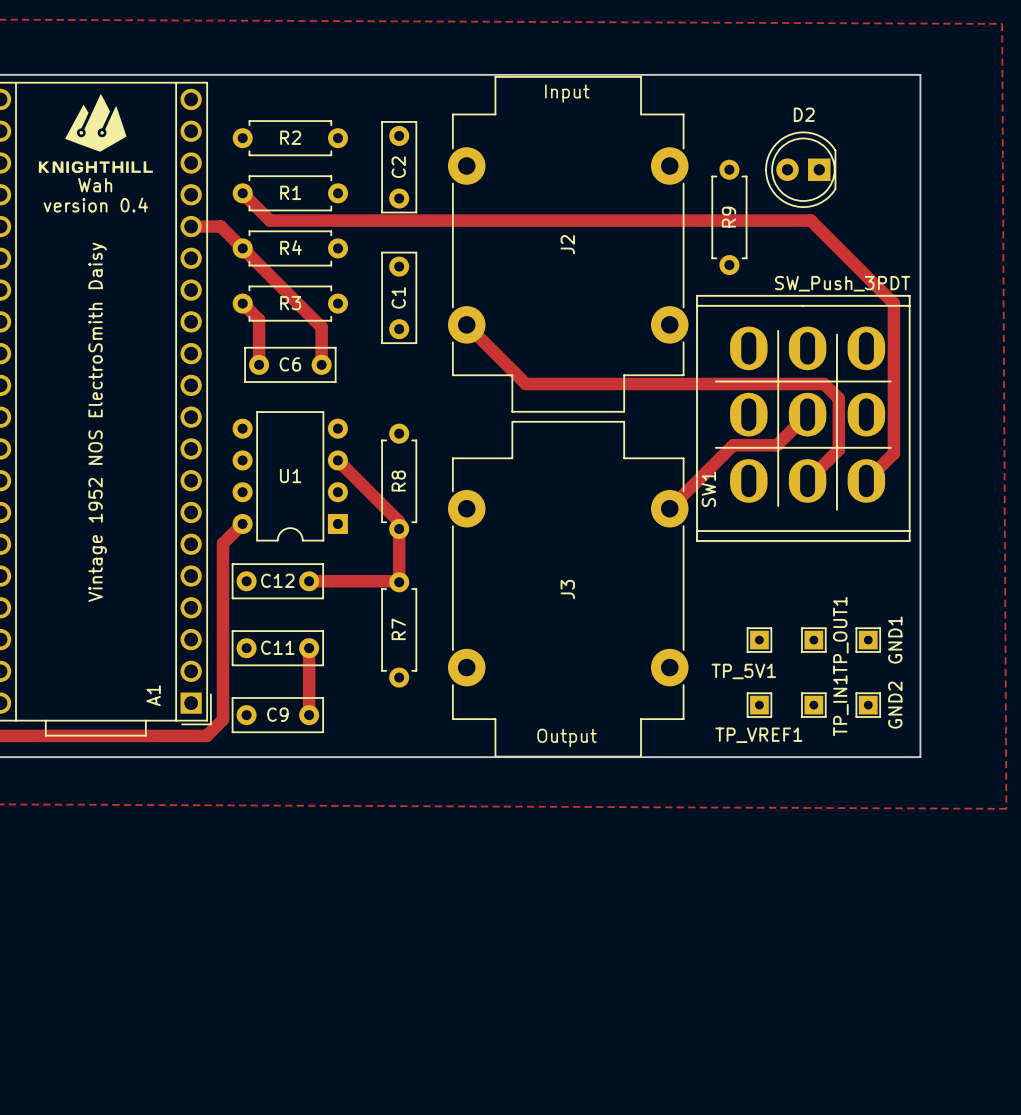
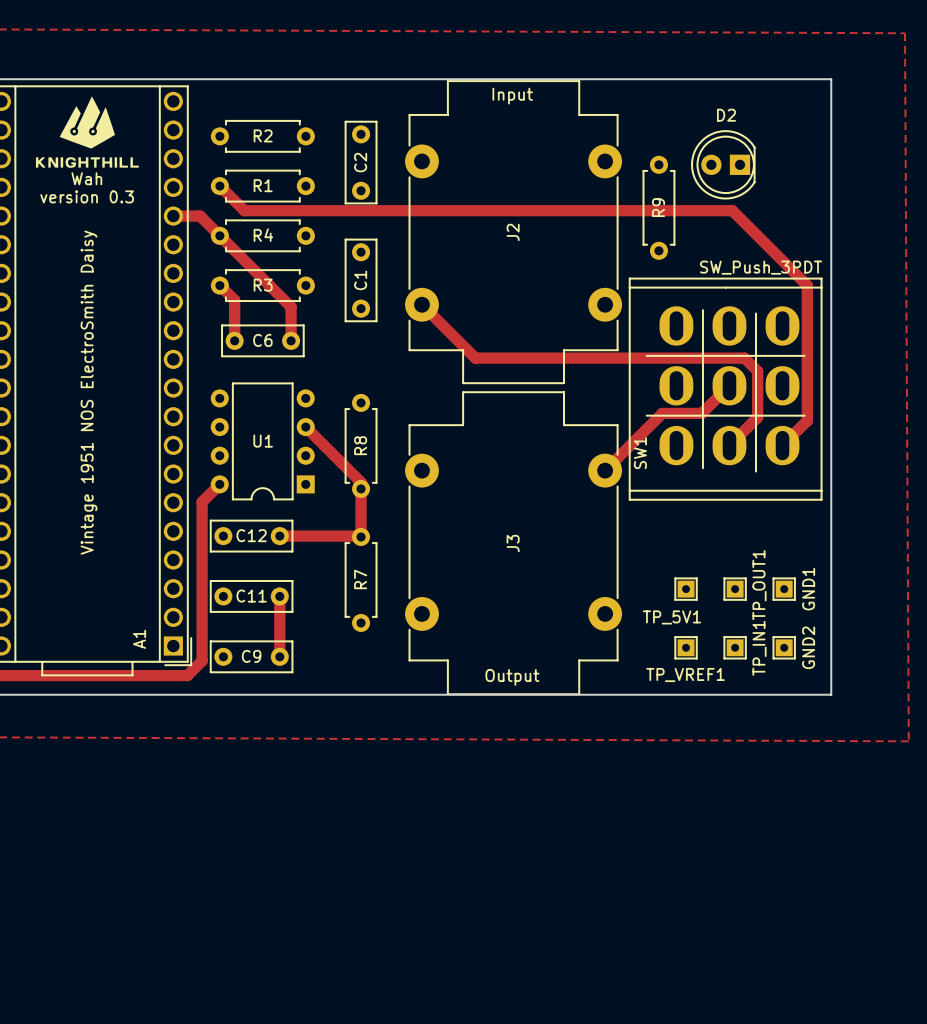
text: version 0.4 (95, 205) -> version 0.3 (87, 196)
text: Vintage 1952 NOS ElectroSmith Daisy (97, 422) -> Vintage 1951 NOS ElectroSmith Daisy (89, 392)

